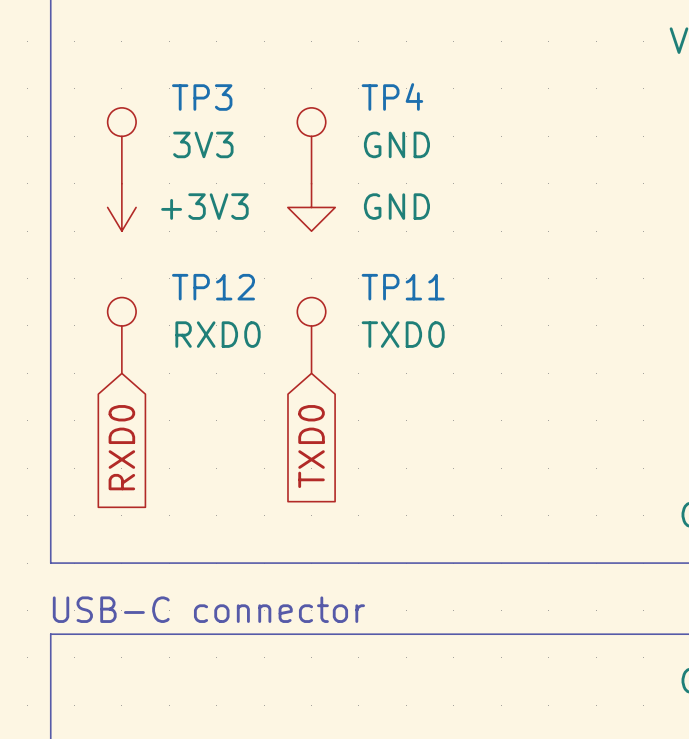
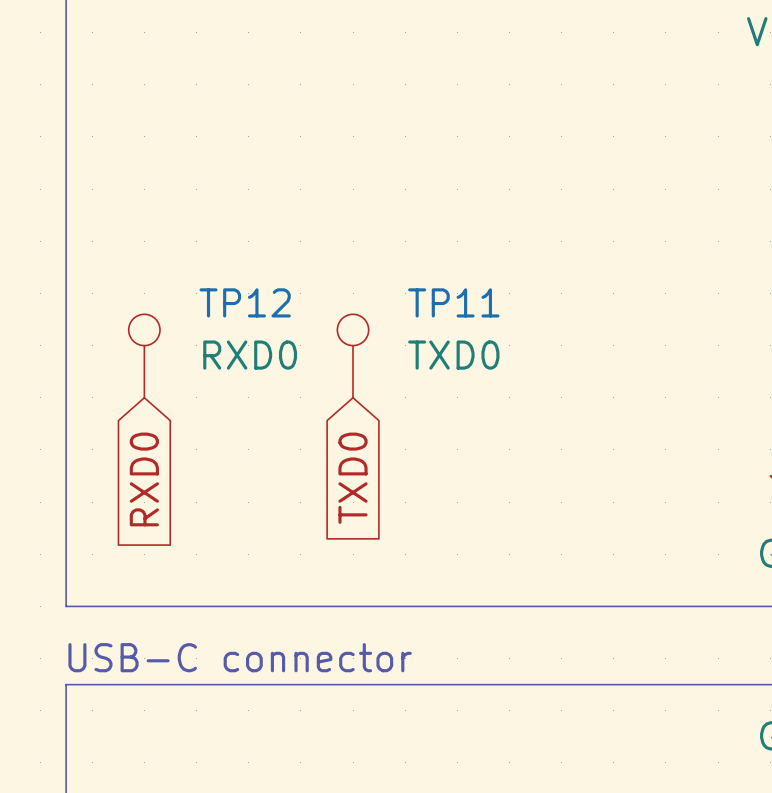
TP3: 3V3 (121, 145) -> none
TP4: GND (311, 145) -> none
power symbol: +3V3 (121, 207) -> none
power symbol: GND (311, 207) -> none

